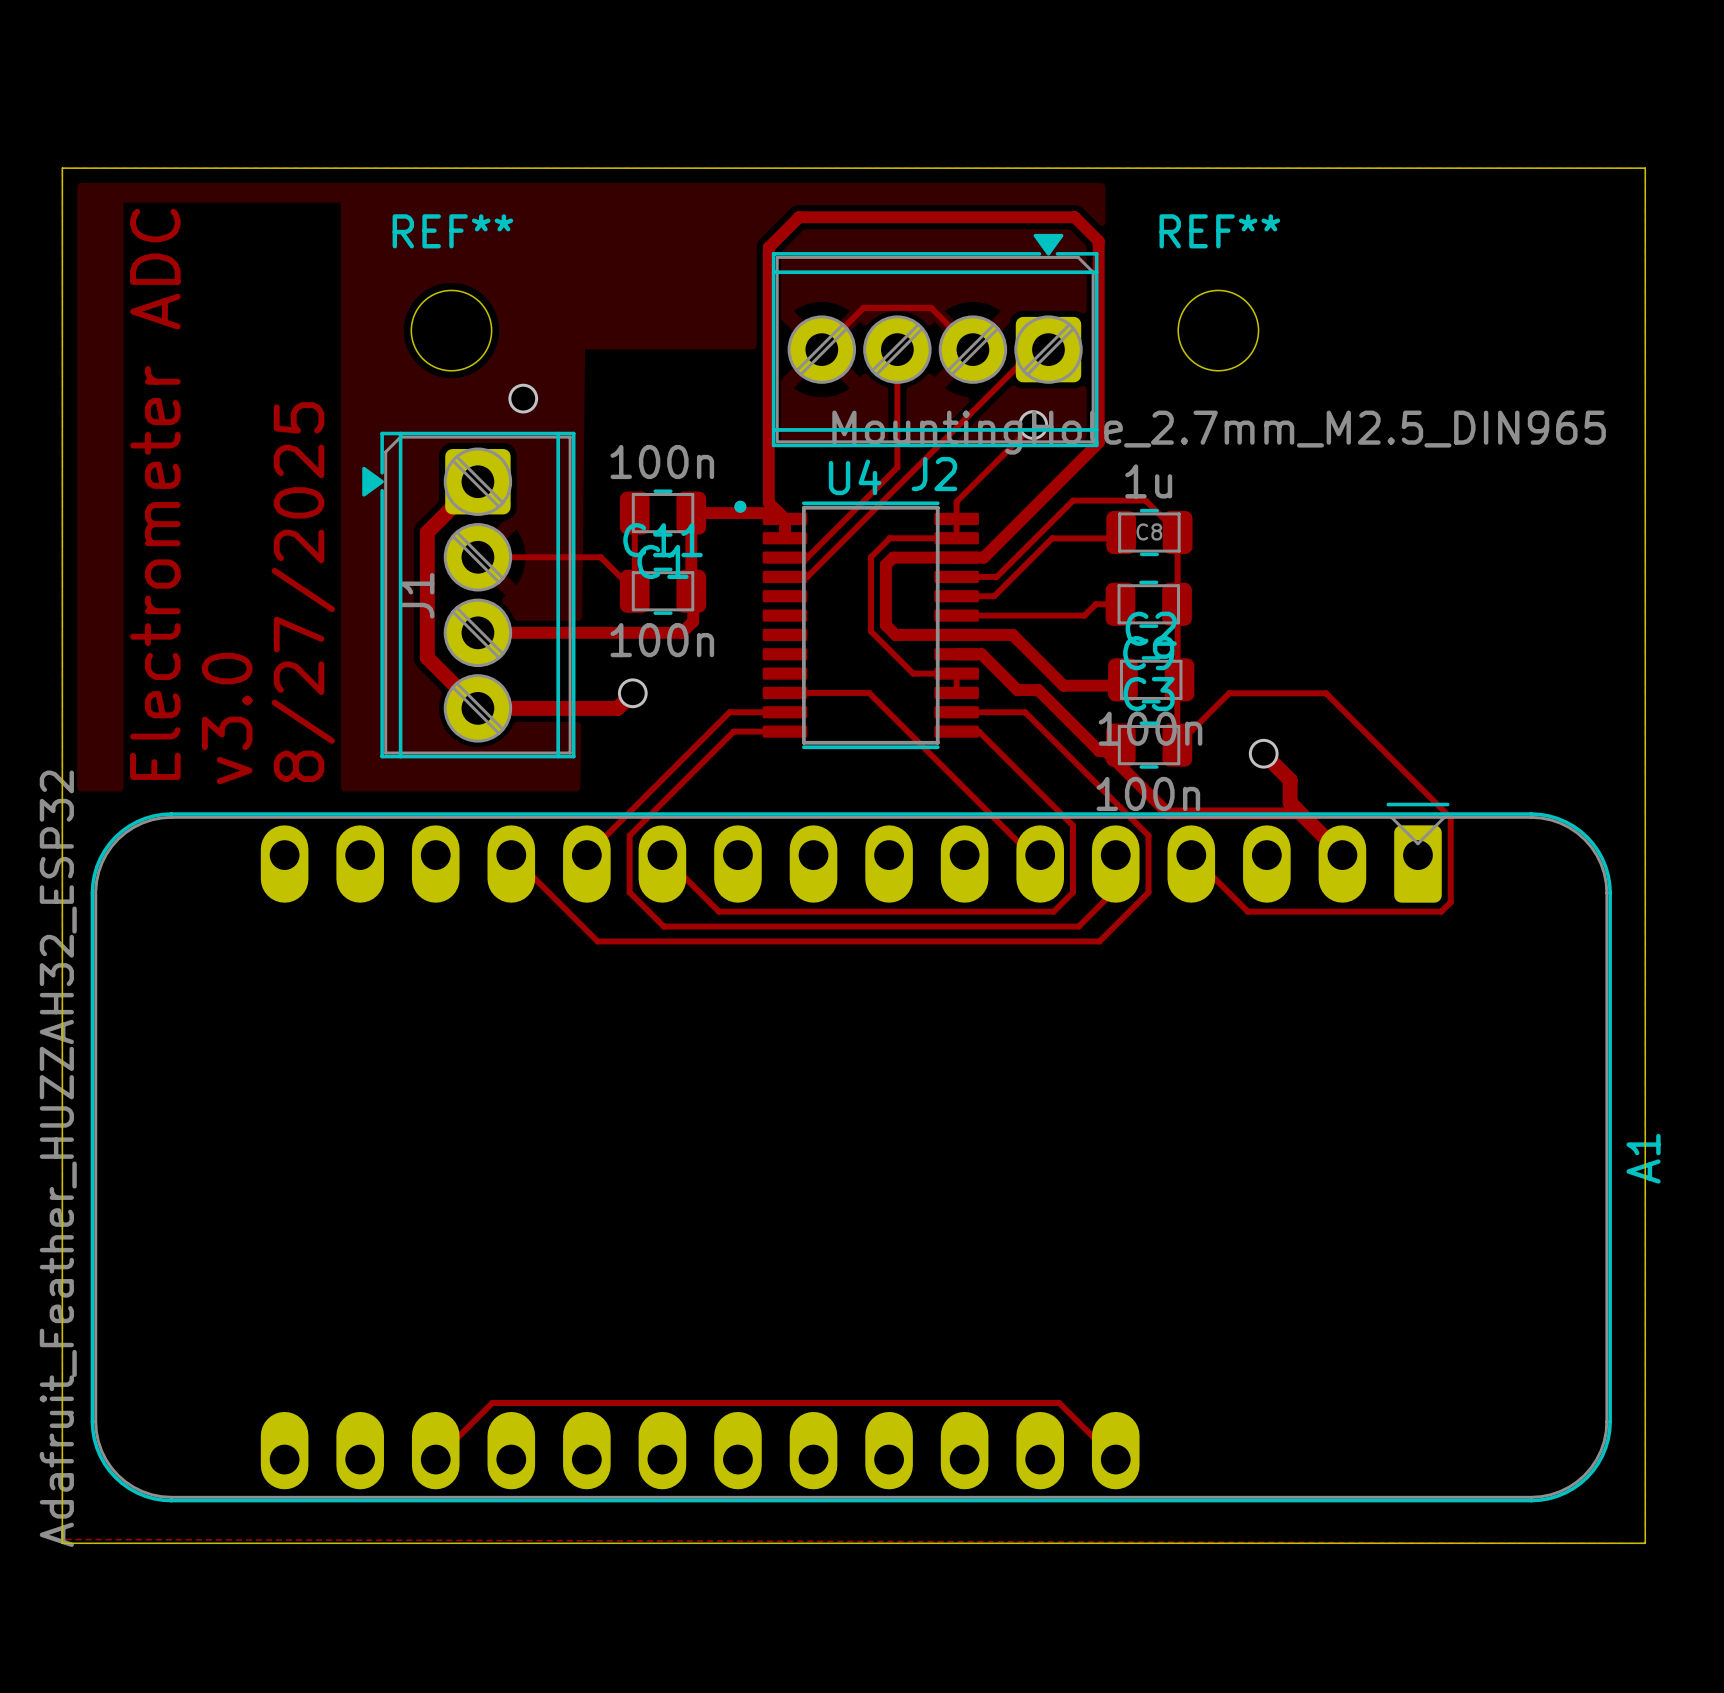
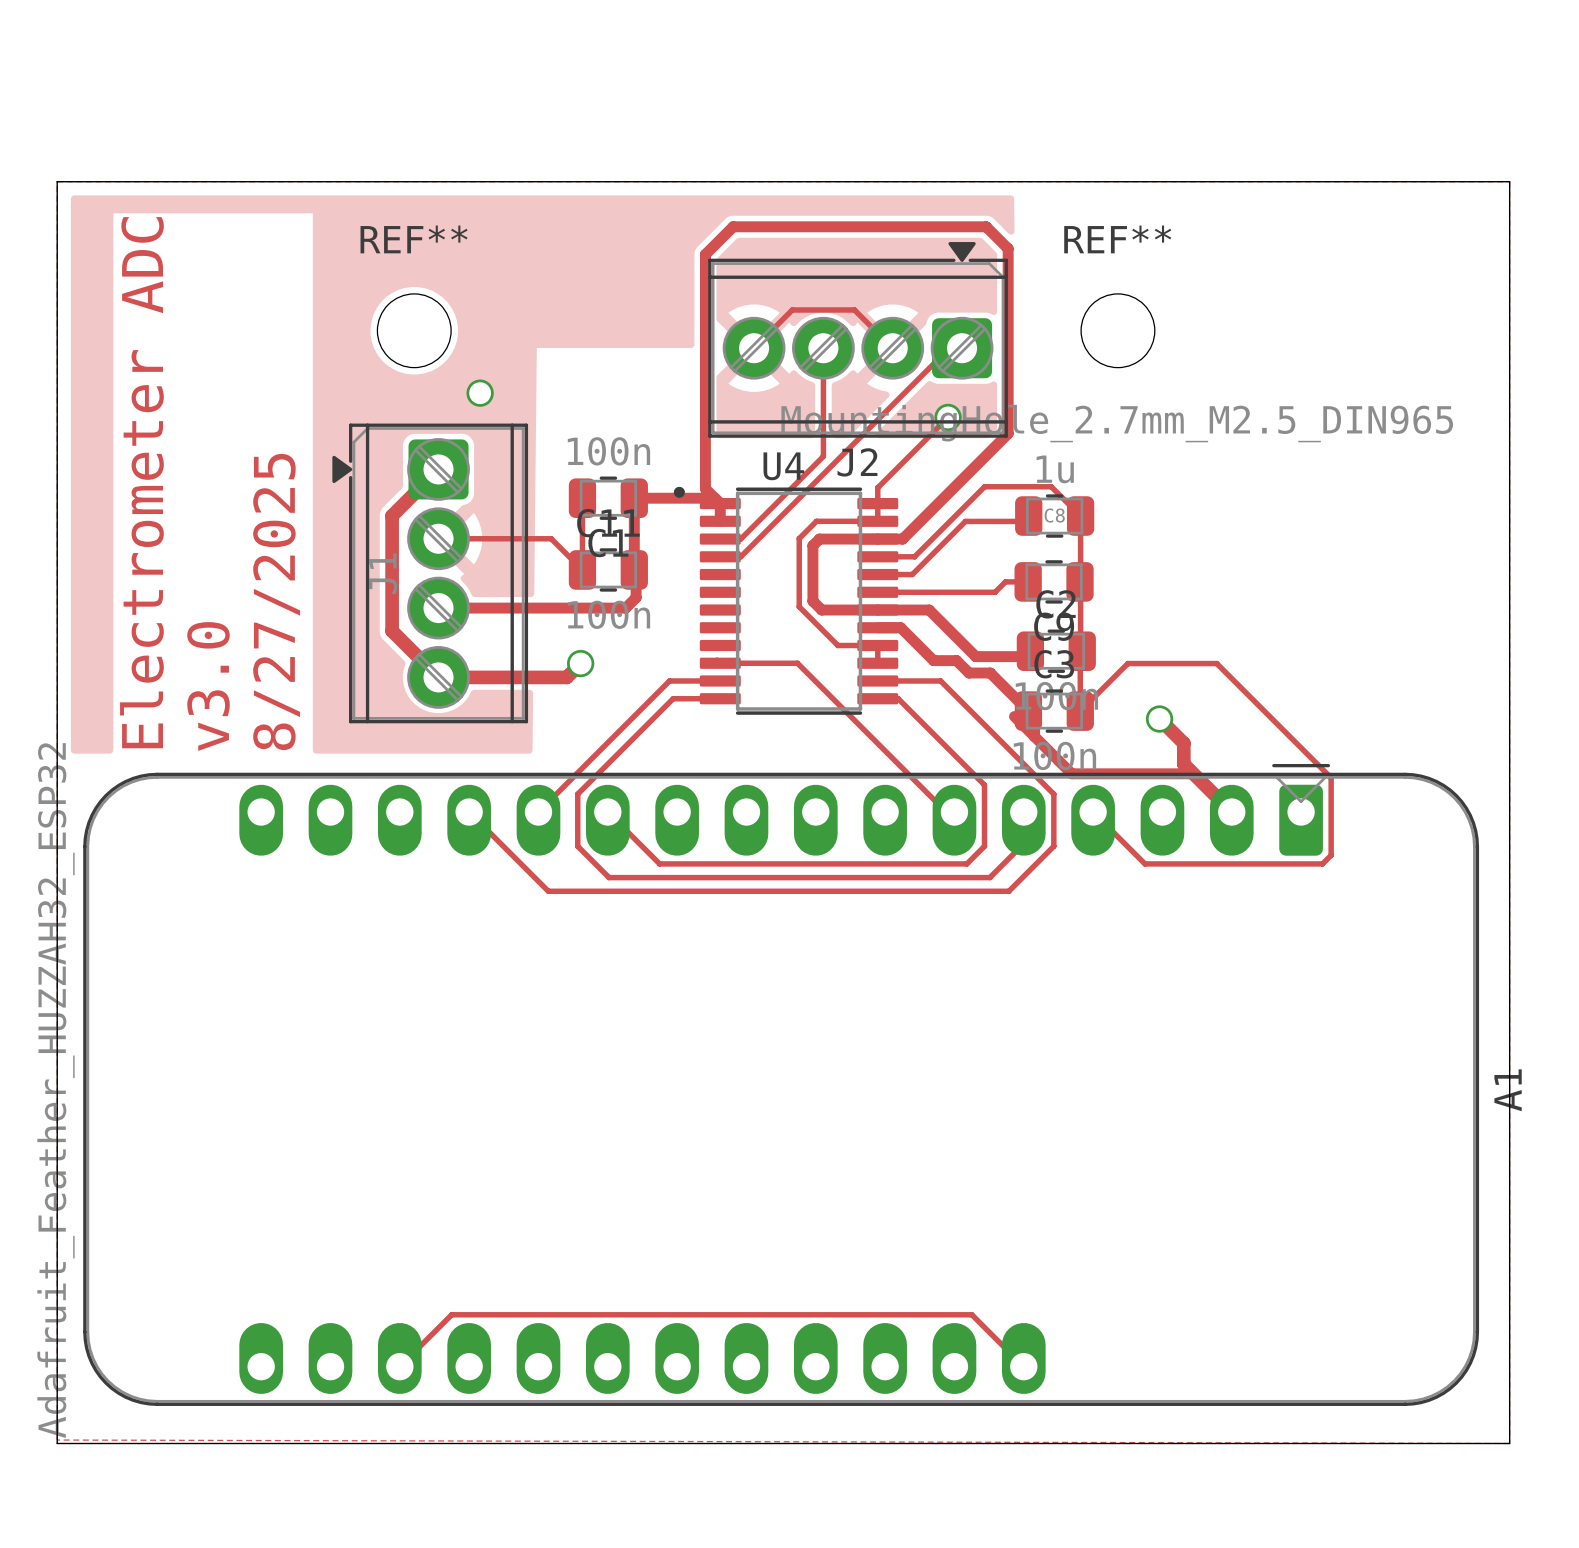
track: (1038, 690) (1099, 750) (1114, 750) (1120, 745) -> (952, 660) (956, 660) (969, 673) (990, 673) (1034, 717) (1034, 736)

